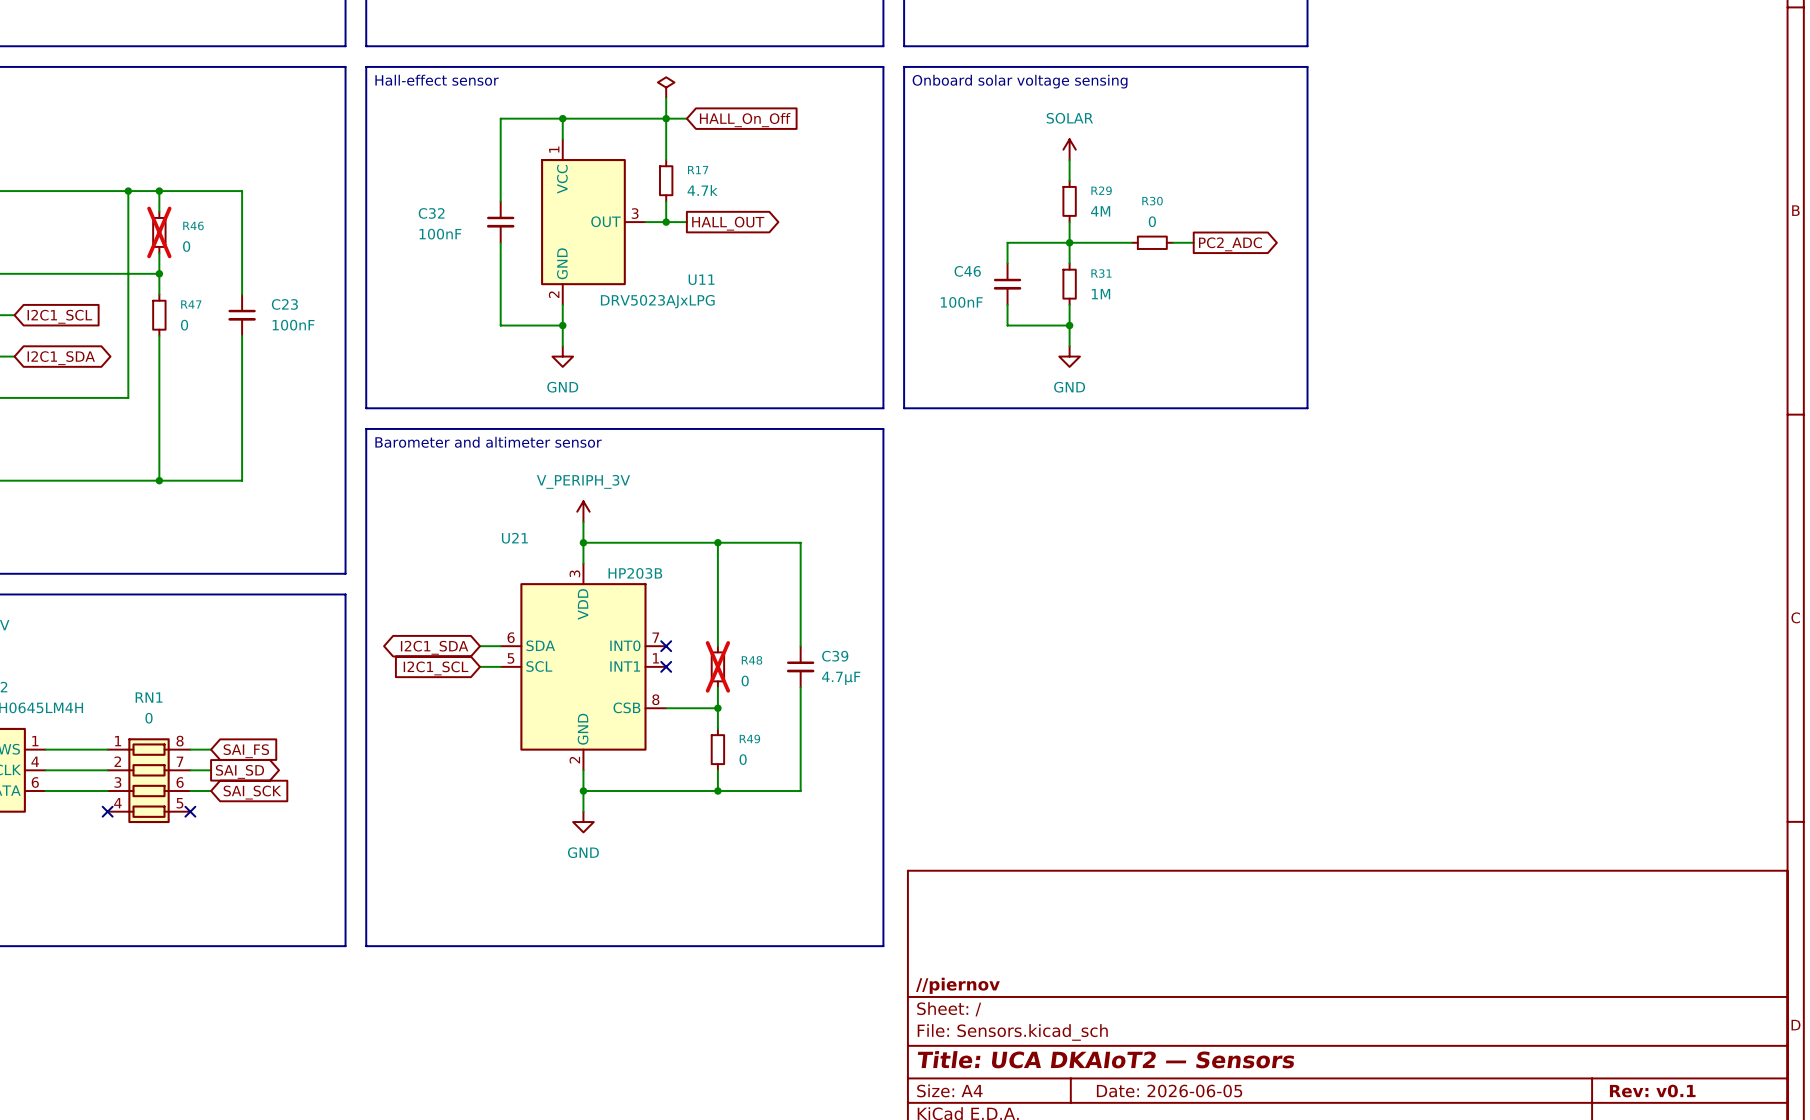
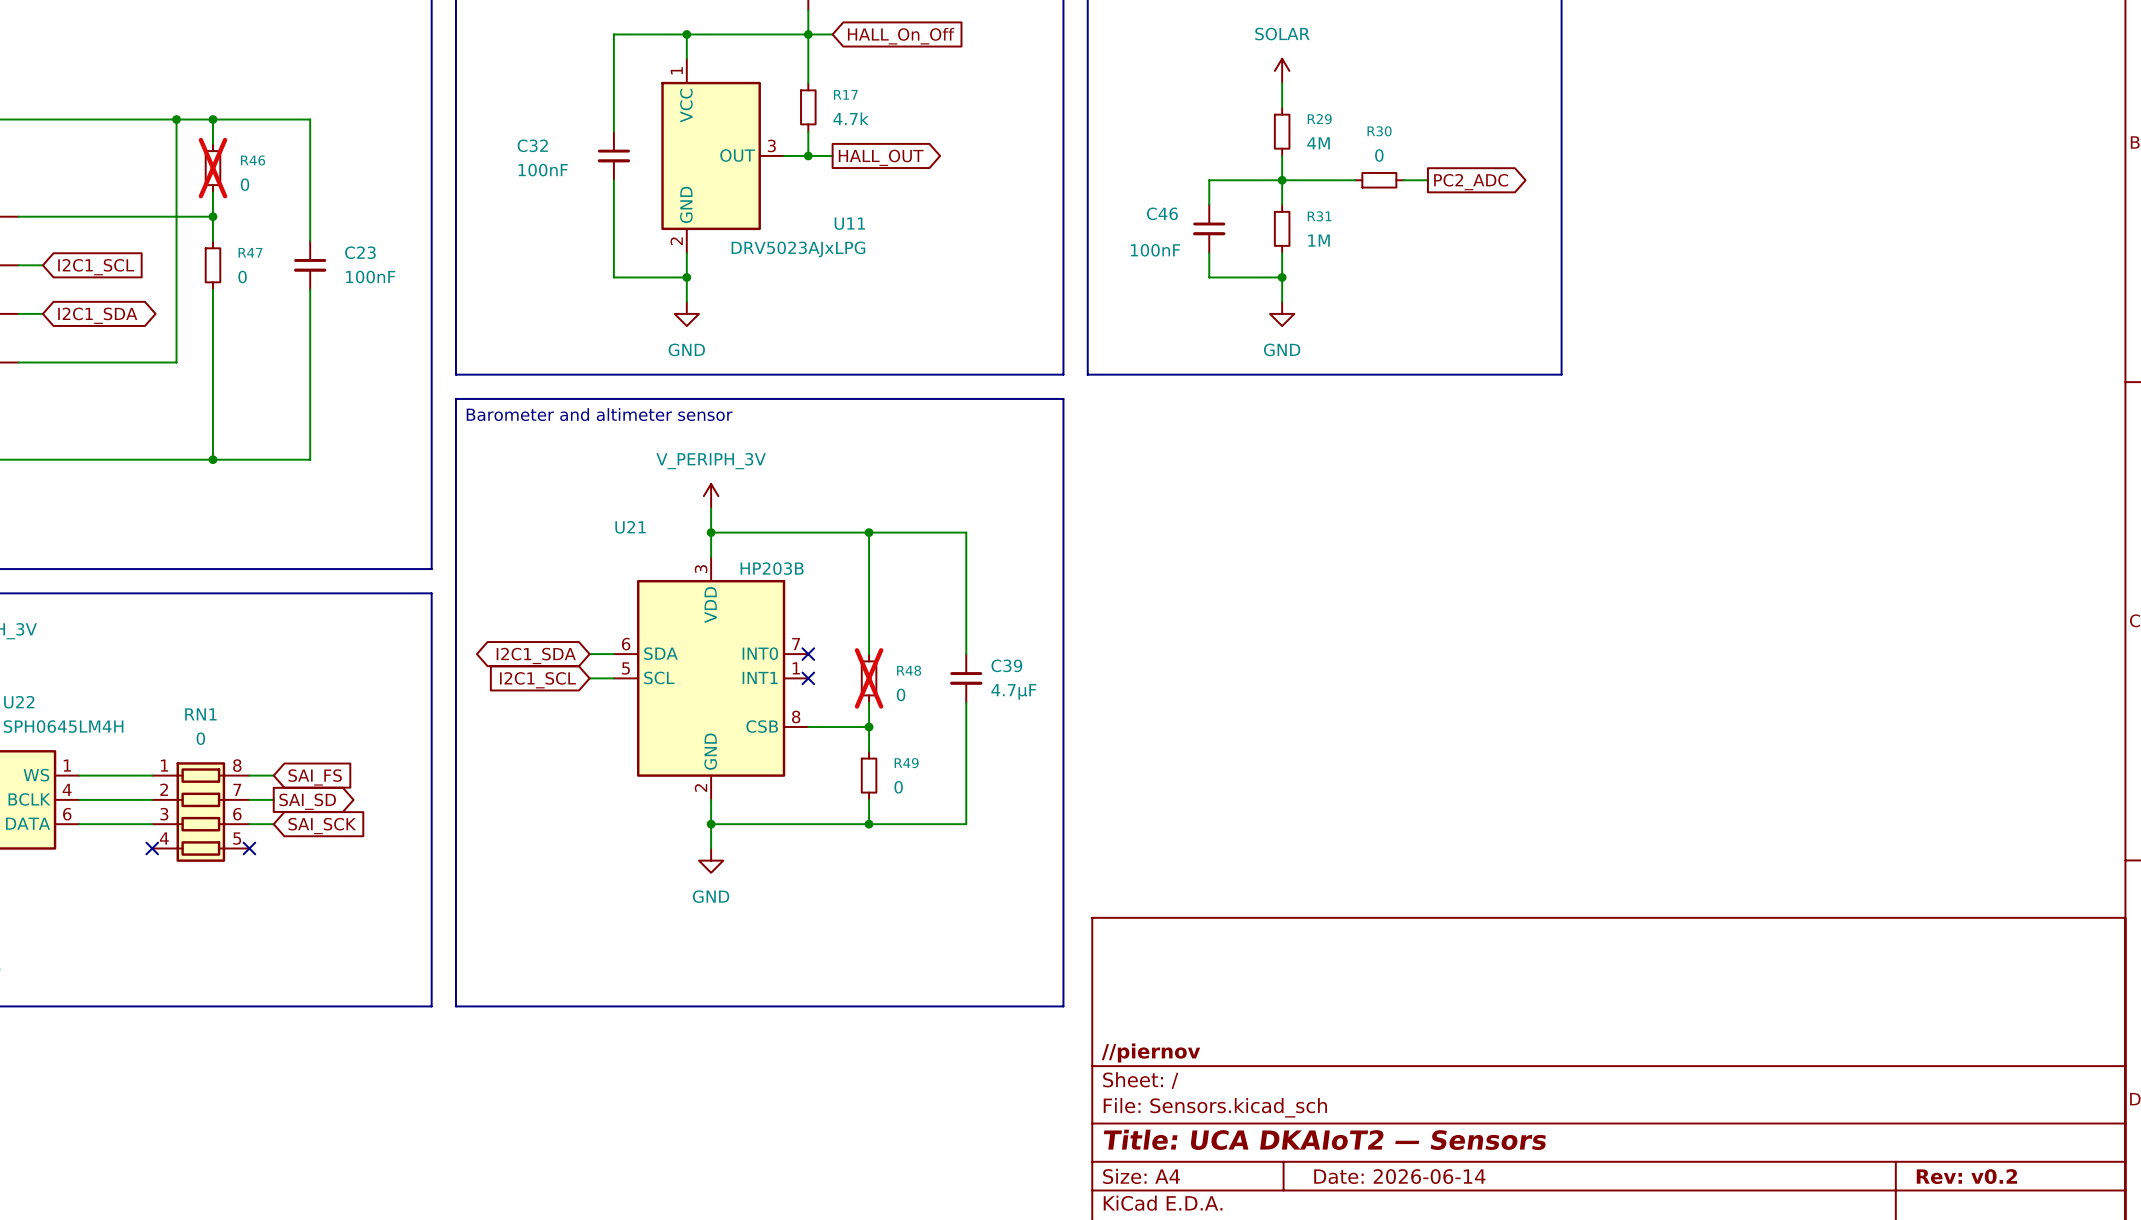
title block: Date: 2026-06-05 (1169, 1091) -> Date: 2026-06-14 (1399, 1176)
title block: Rev: v0.1 (1652, 1091) -> Rev: v0.2 (1966, 1176)

